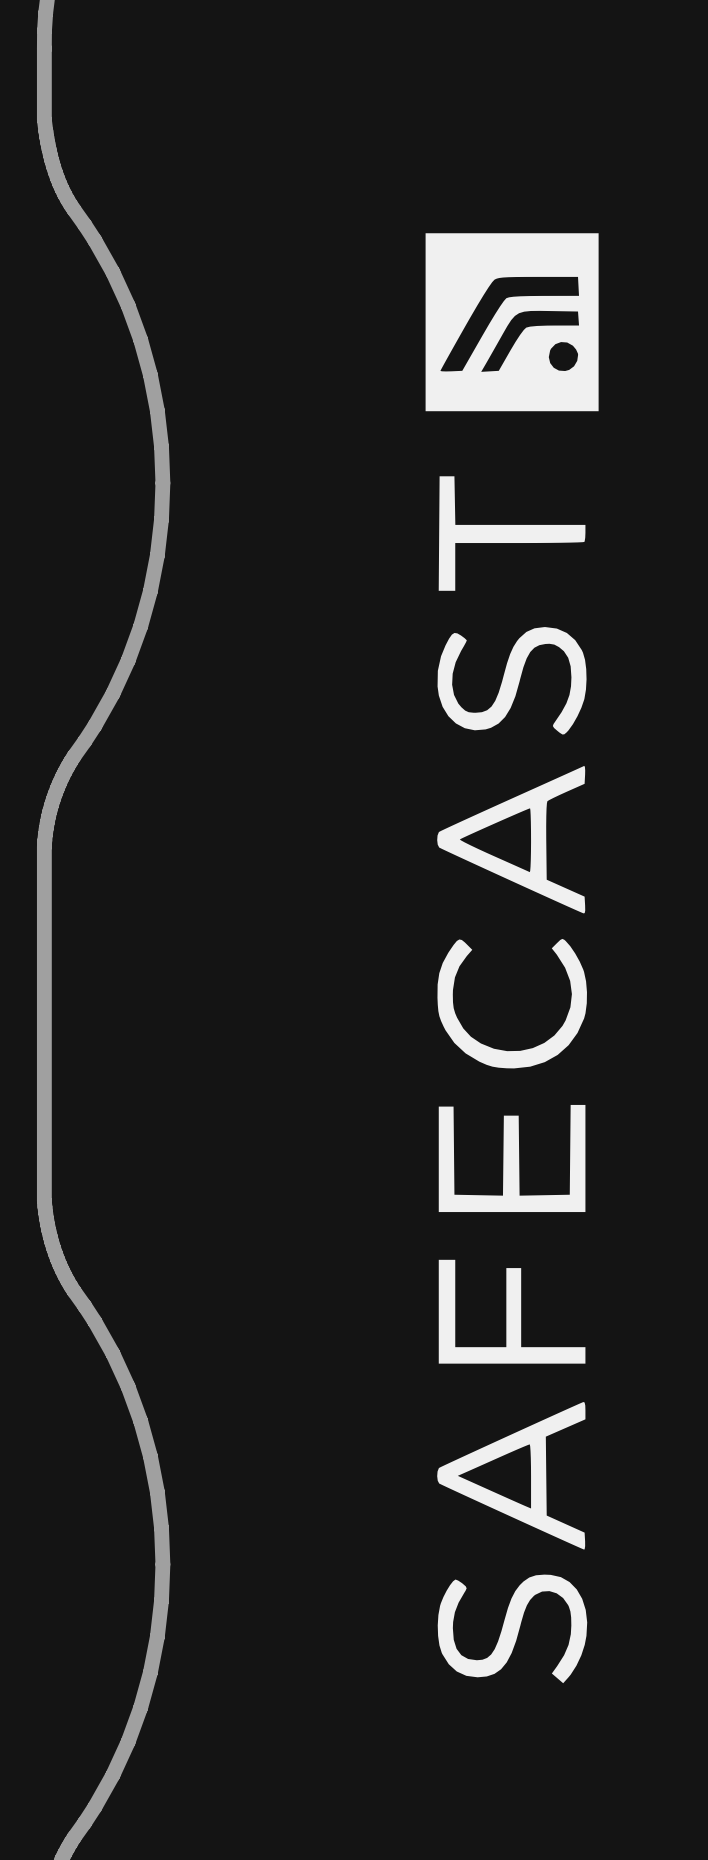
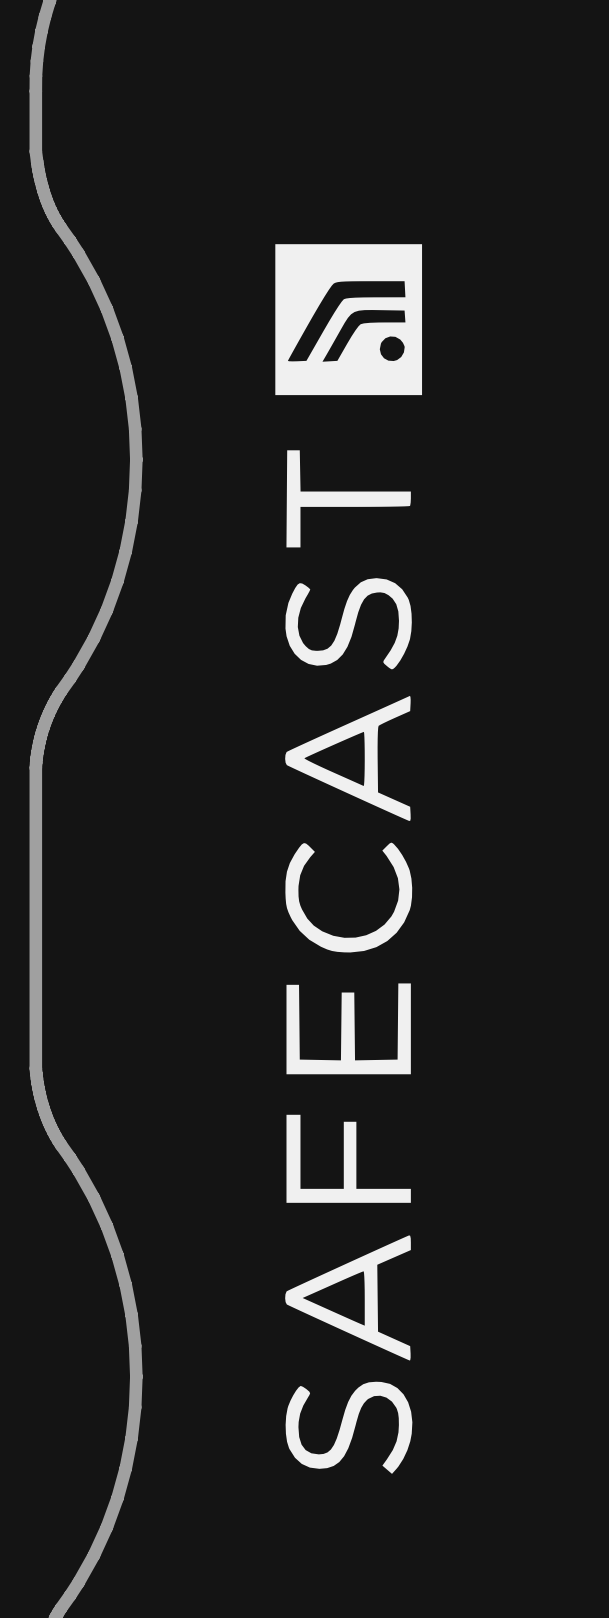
drawing position: (512, 958) -> (348, 859)

